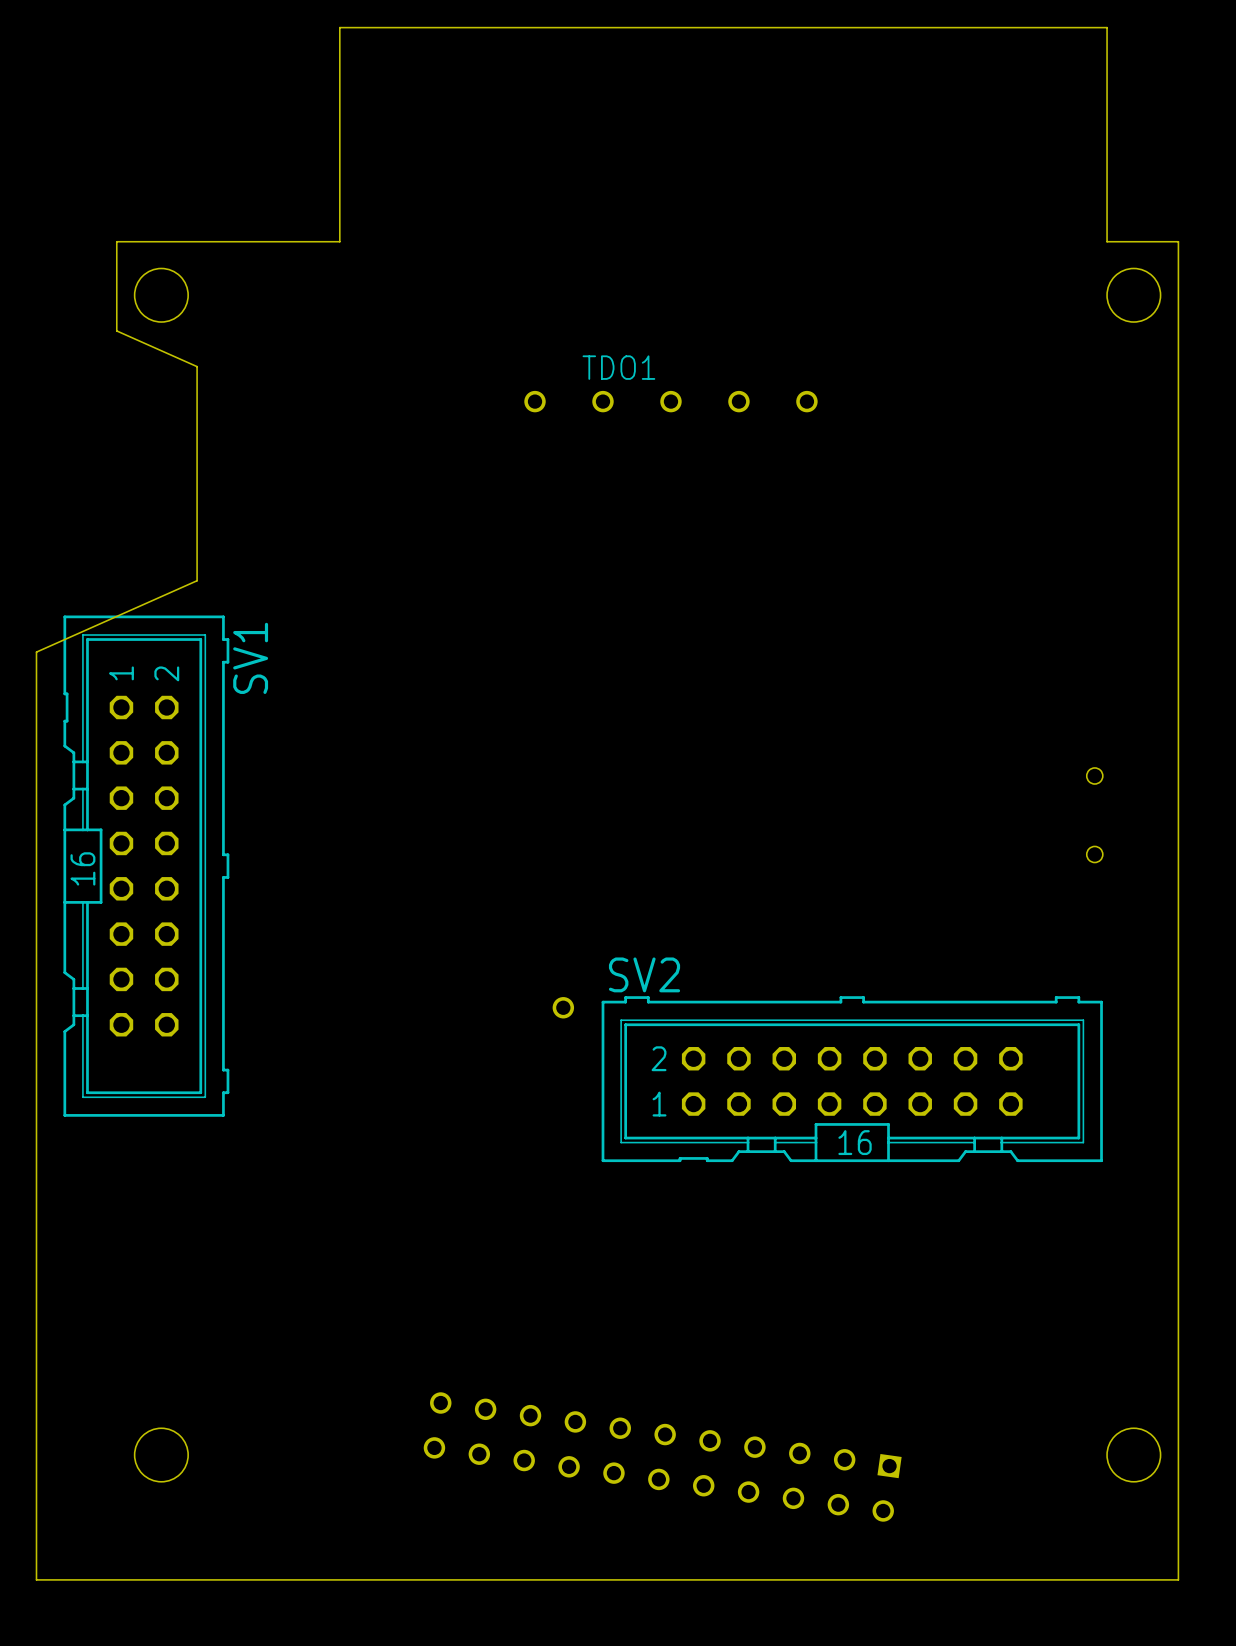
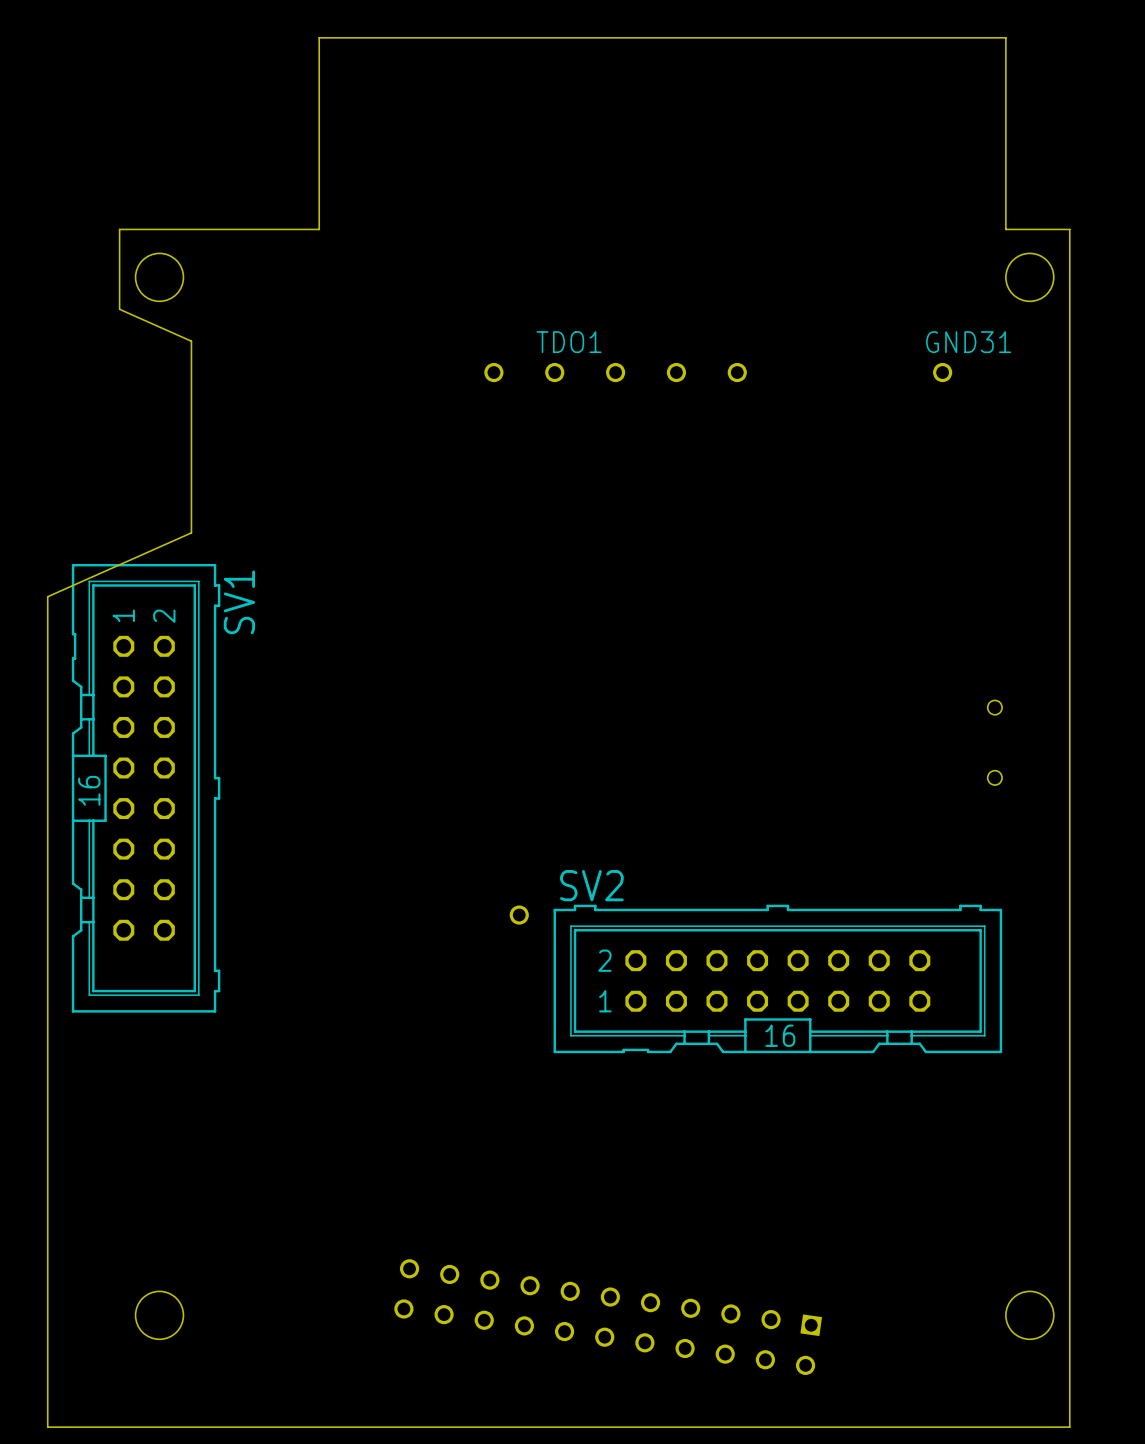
GND31: none -> (942, 372)

